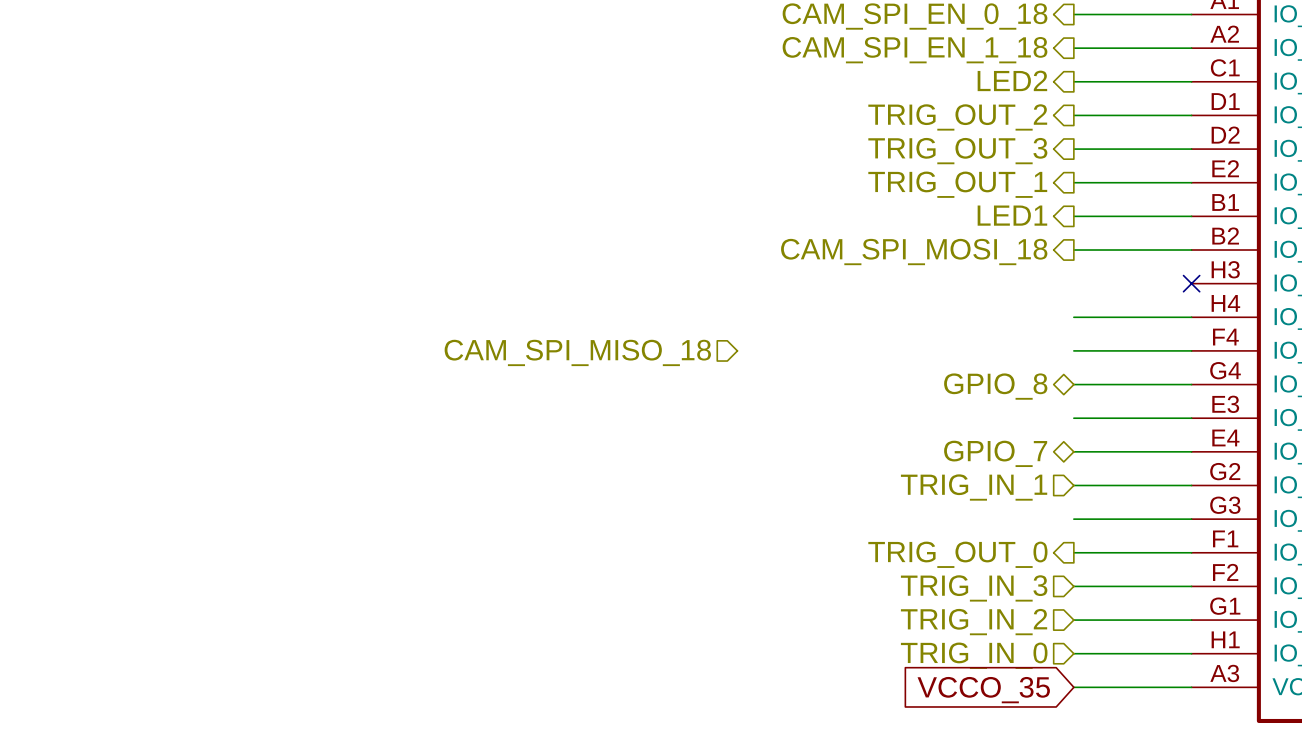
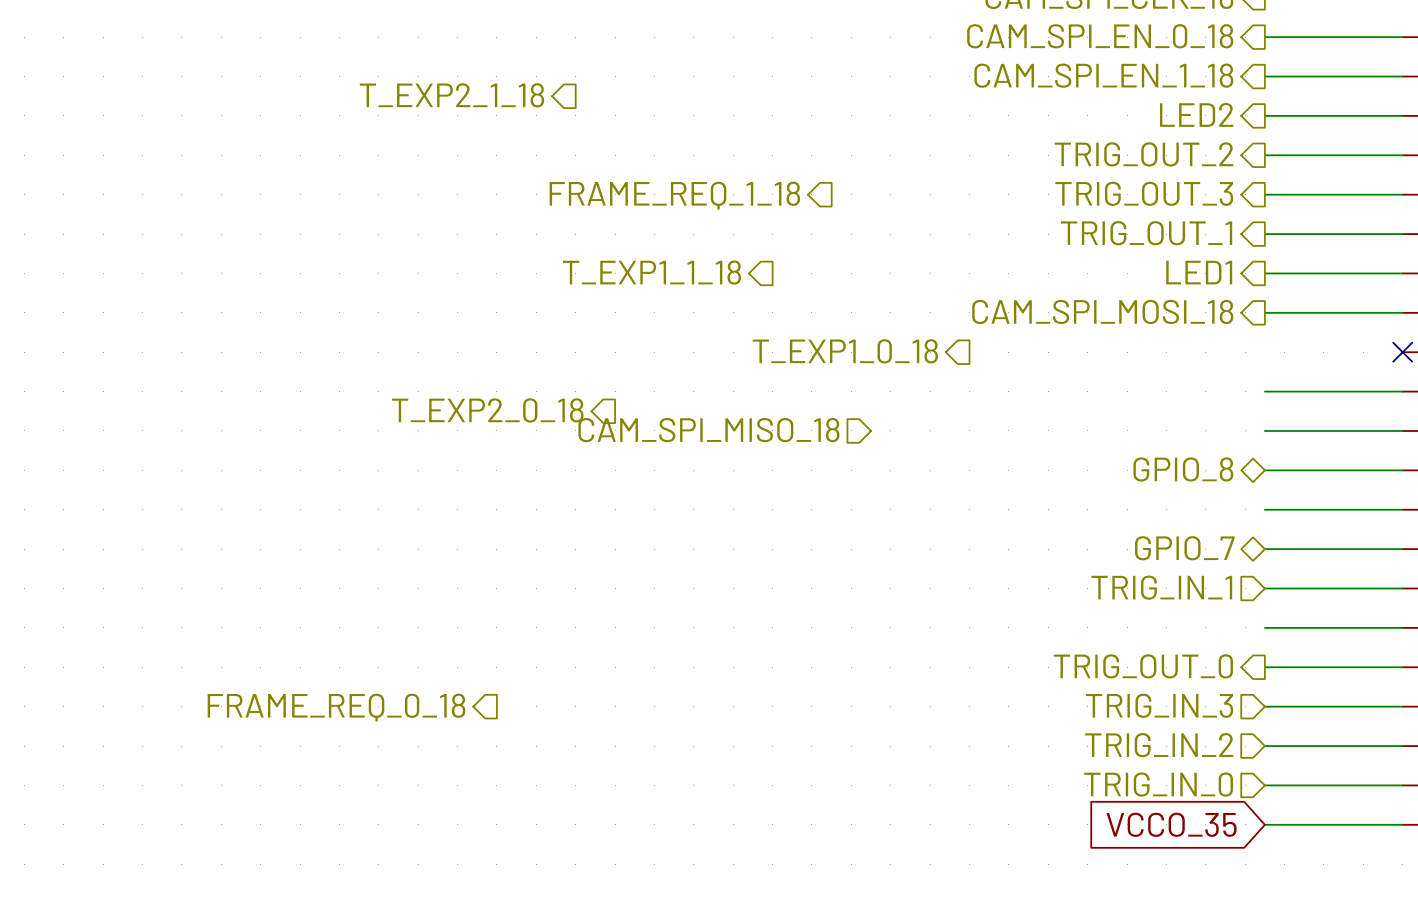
hierarchical label: none -> T_EXP2_1_18 (451, 95)
hierarchical label: none -> FRAME_REQ_1_18 (674, 195)
hierarchical label: none -> T_EXP1_1_18 (651, 272)
hierarchical label: none -> T_EXP1_0_18 (845, 351)
hierarchical label: none -> T_EXP2_0_18 (487, 410)
hierarchical label: none -> FRAME_REQ_0_18 (336, 707)

